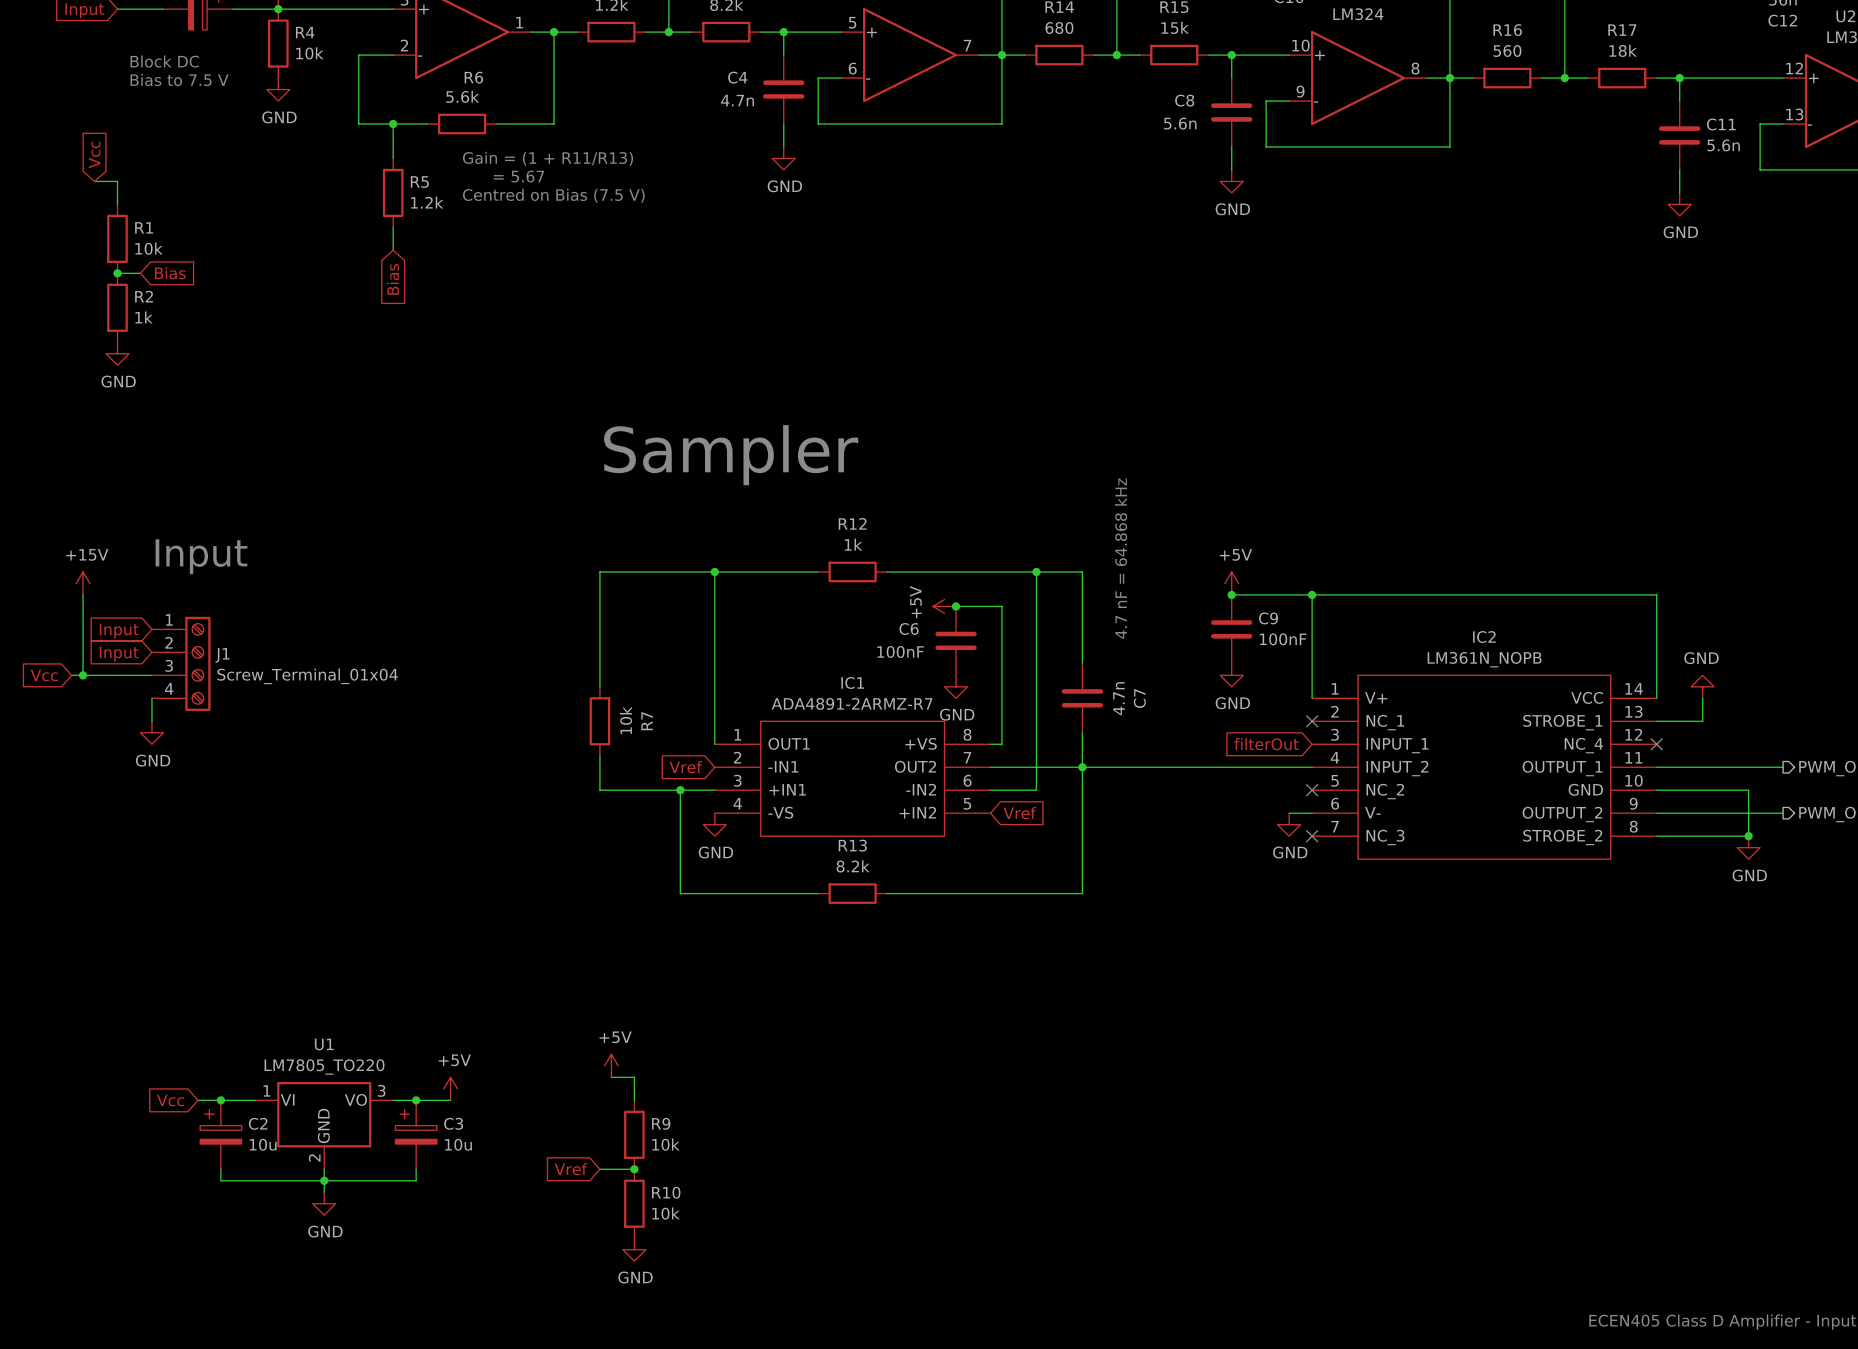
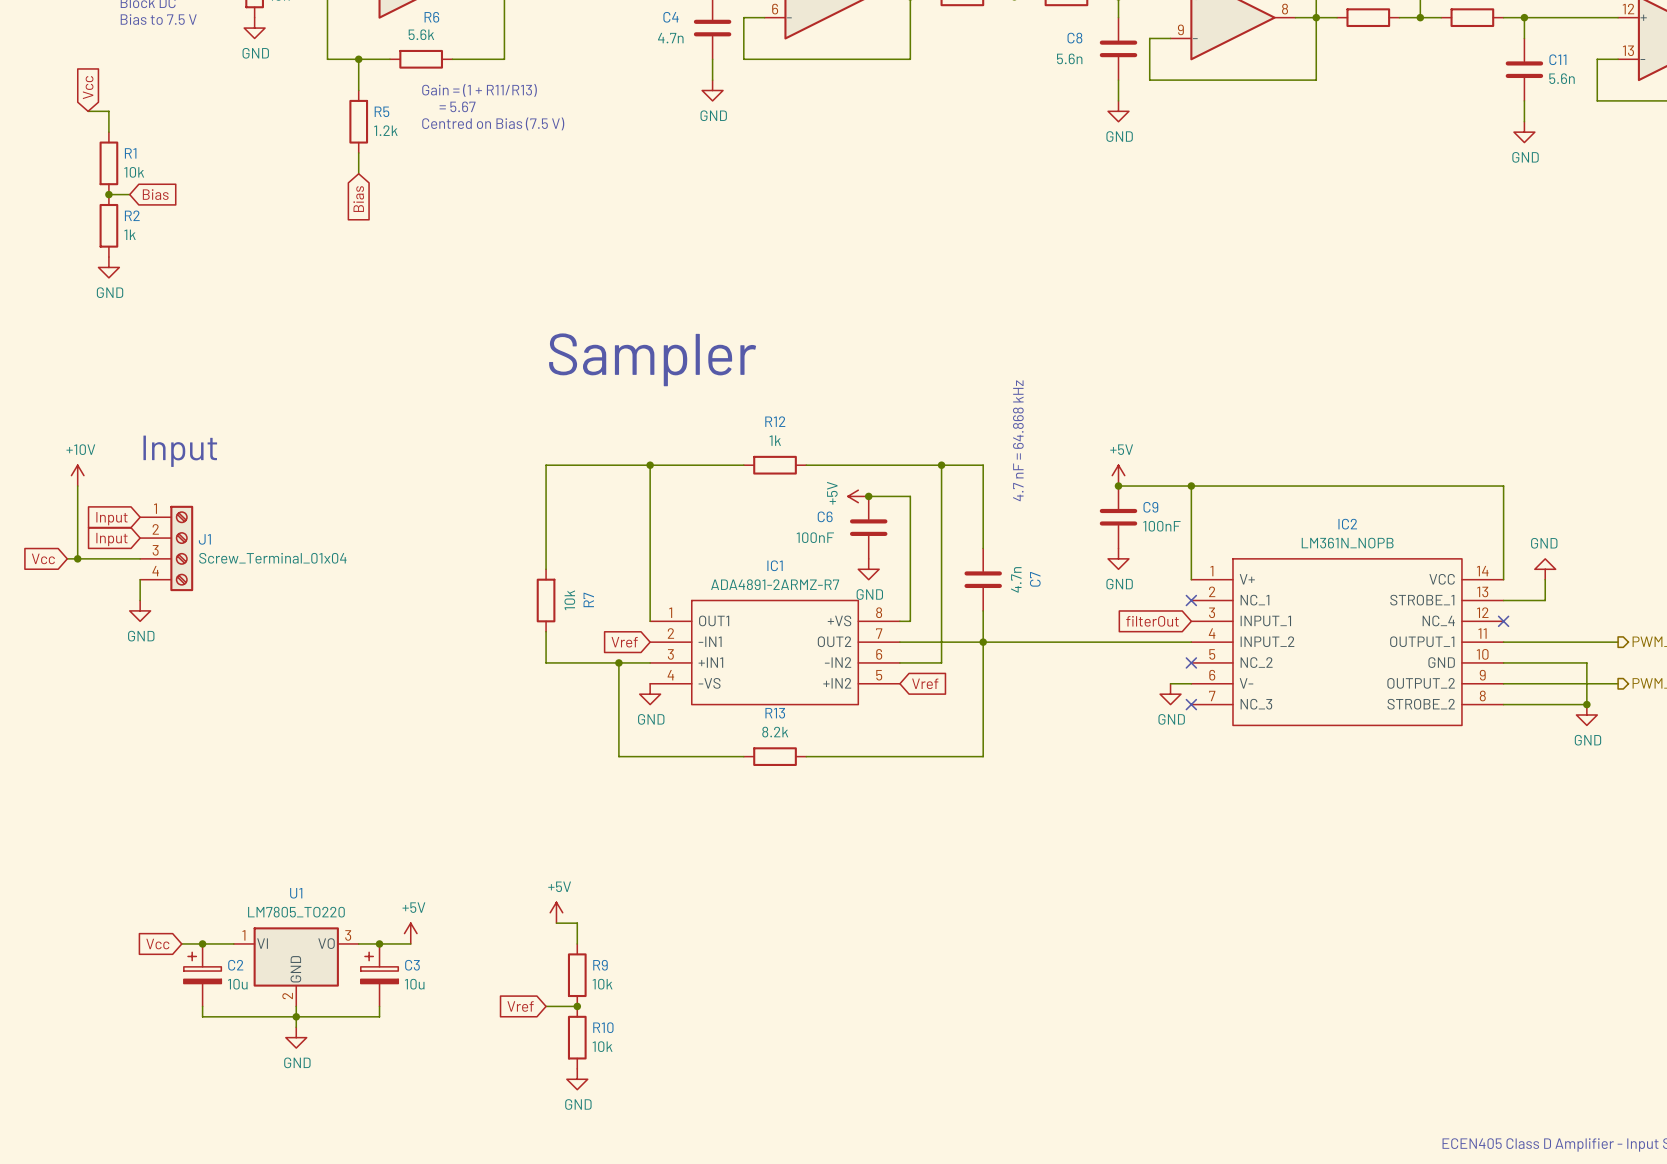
power symbol: +15V (83, 583) -> +10V (77, 475)

